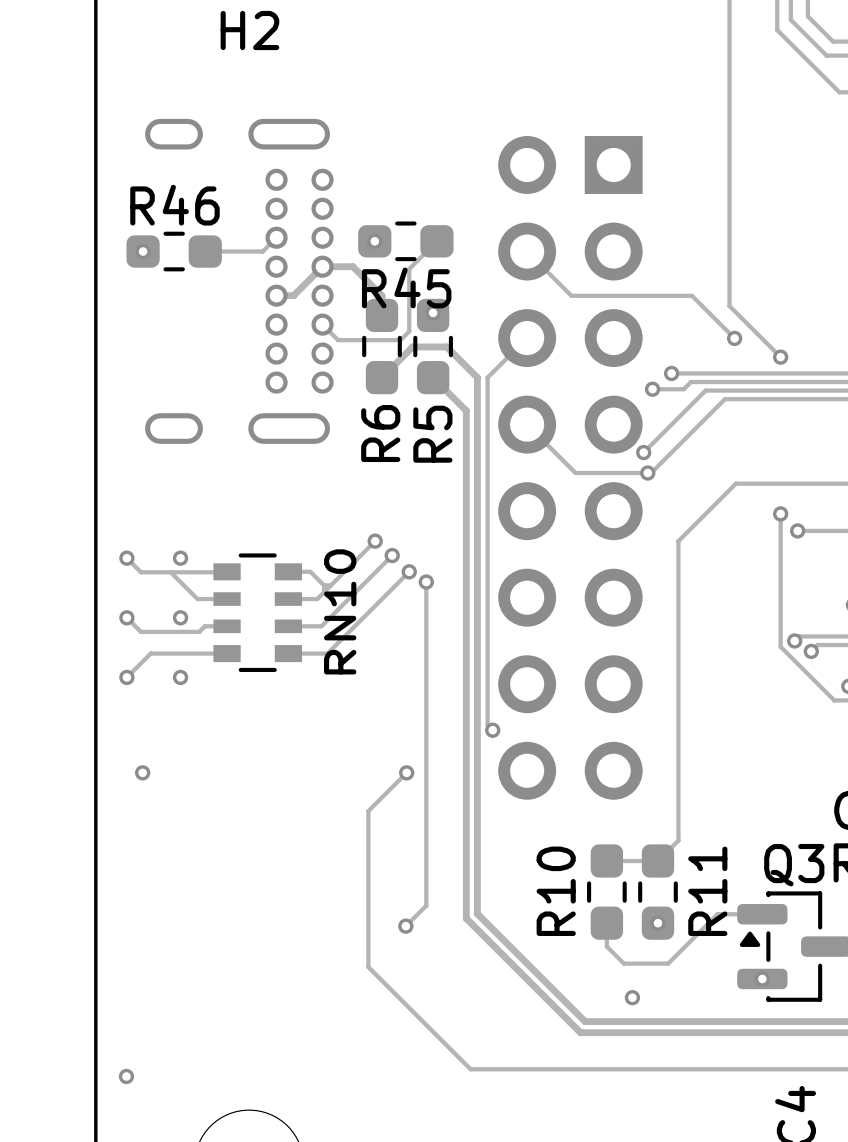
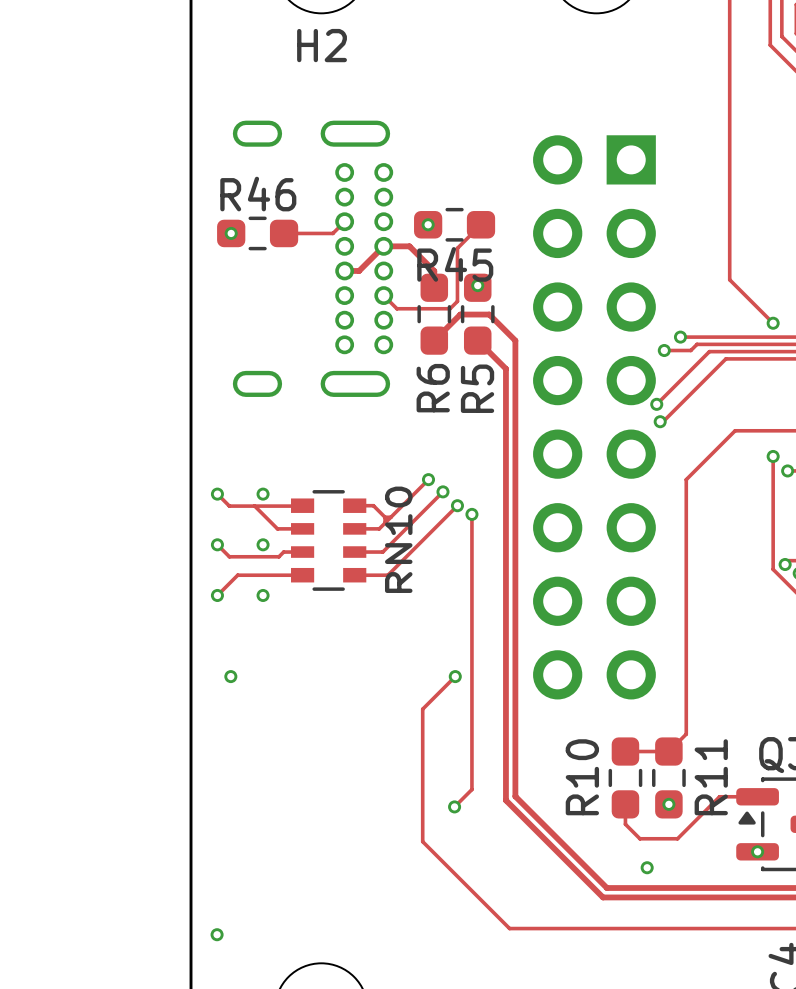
track: (527, 251) (571, 295) (692, 295) (734, 338) -> none
track: (527, 338) (487, 377) (487, 725) (492, 730) -> none
via: (734, 338) -> none
track: (527, 424) (575, 473) (647, 473) -> none
via: (492, 730) -> none

